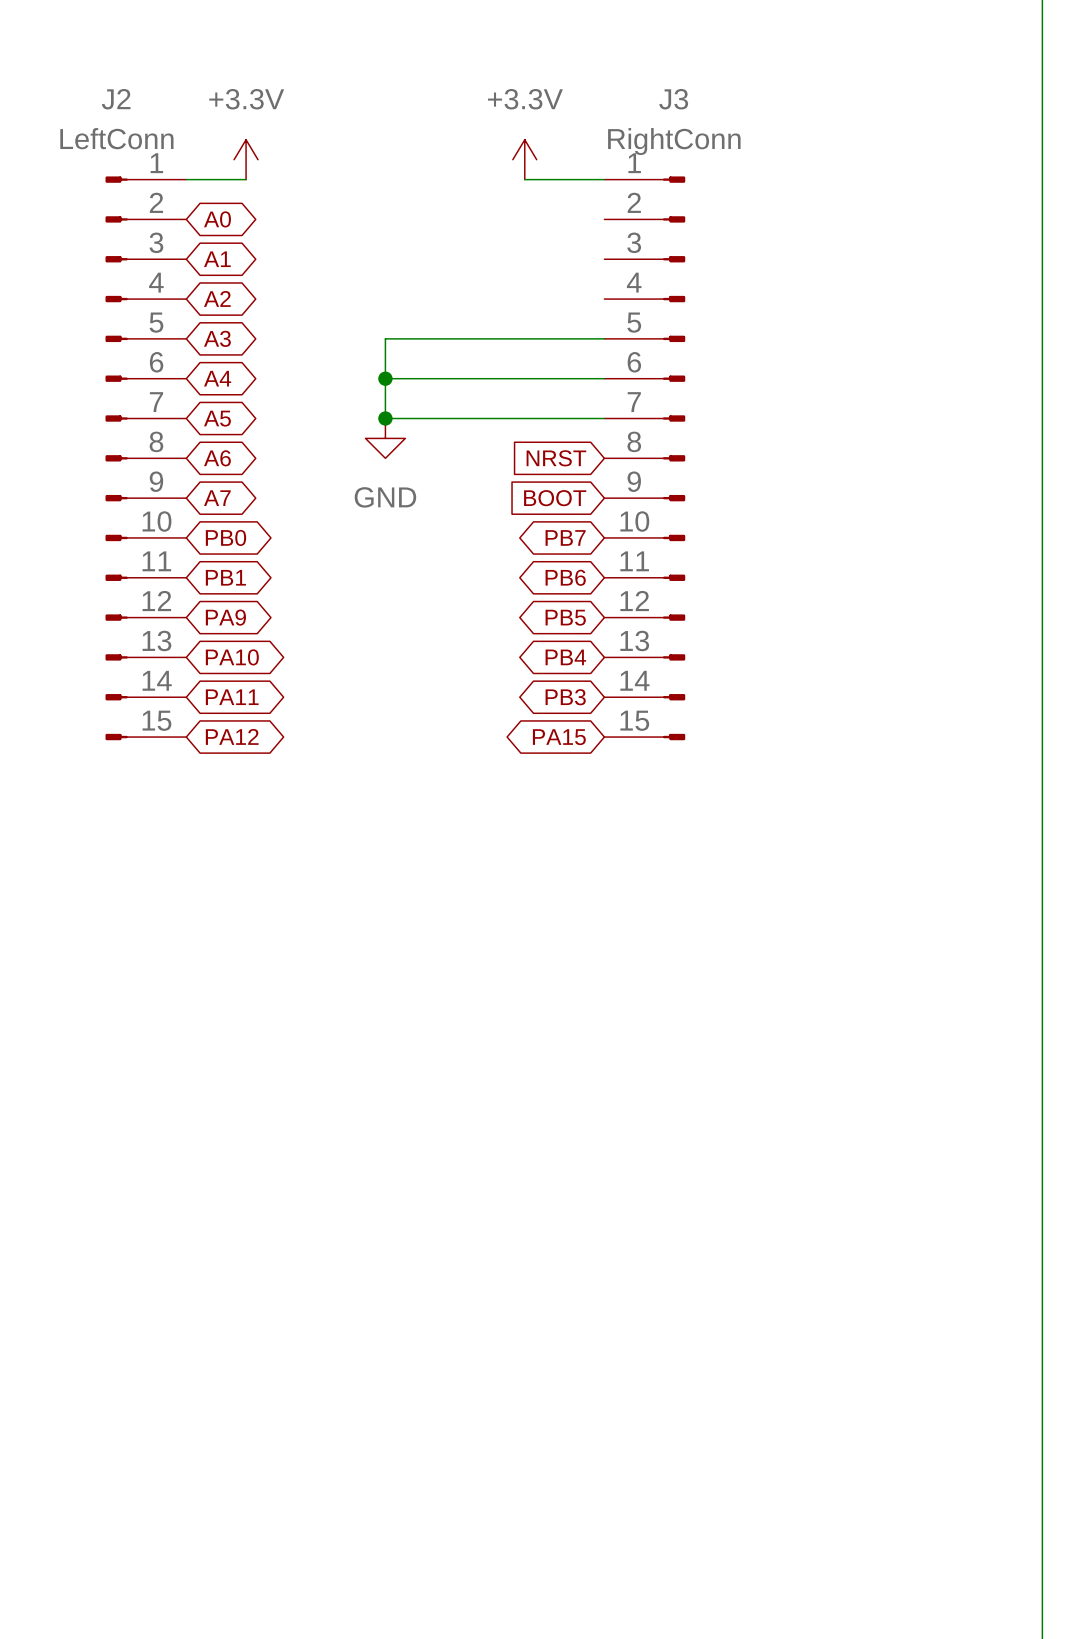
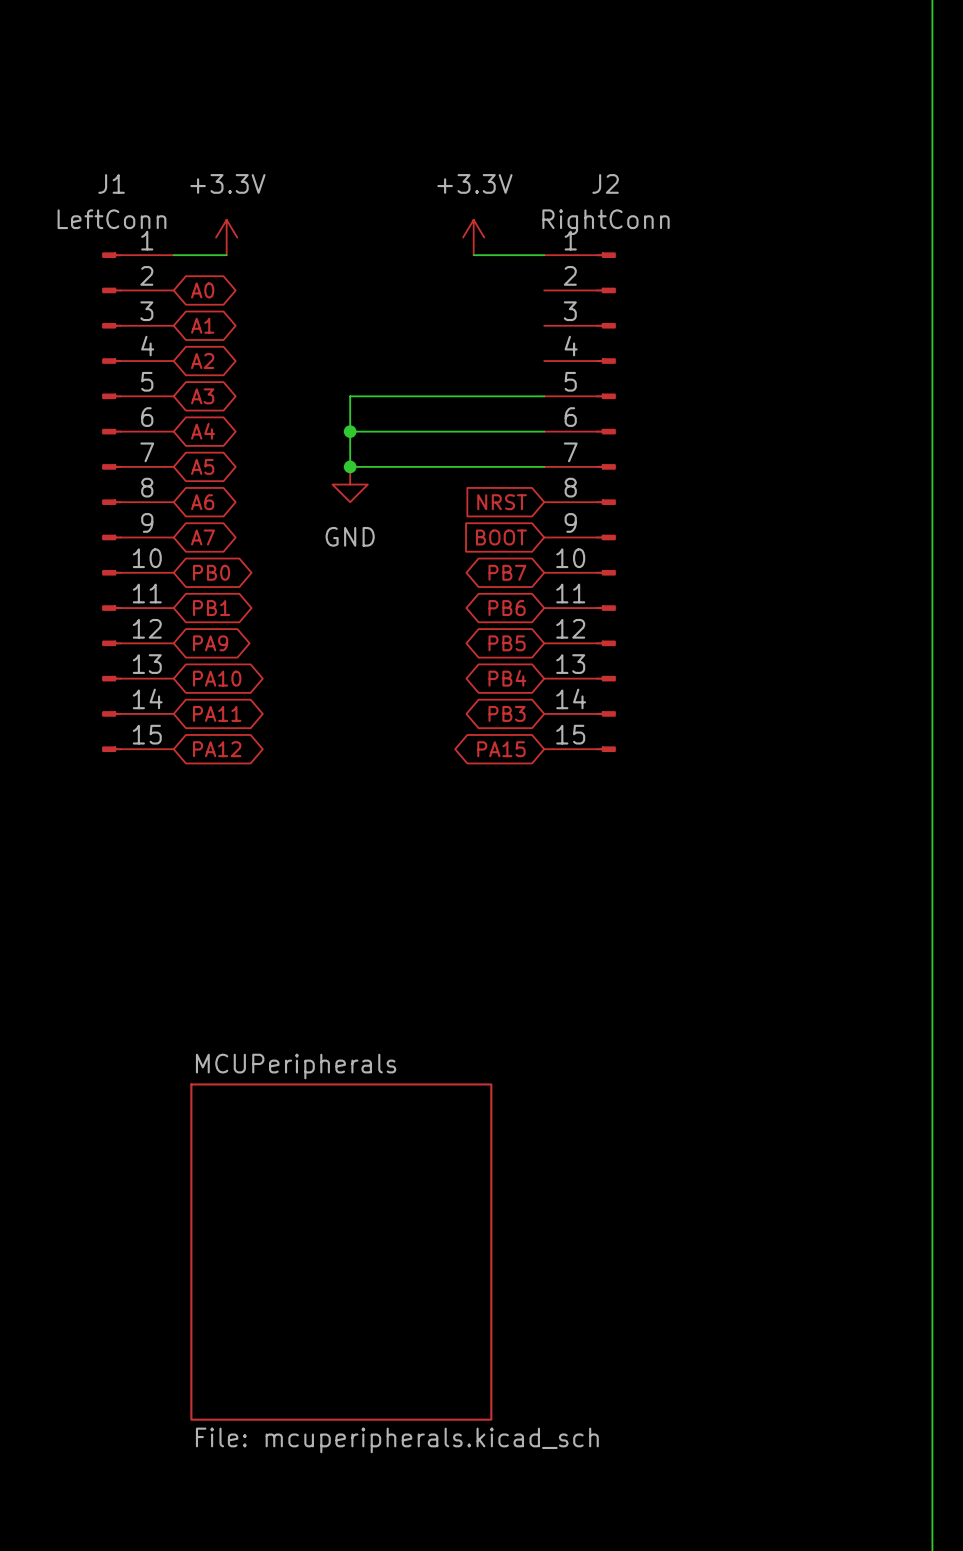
J2 name: J2 (116, 99) -> J1 (111, 183)
J3 name: J3 (673, 99) -> J2 (605, 183)
sheet MCUPeripherals: none -> File: mcuperipherals.kicad_sch (341, 1252)

